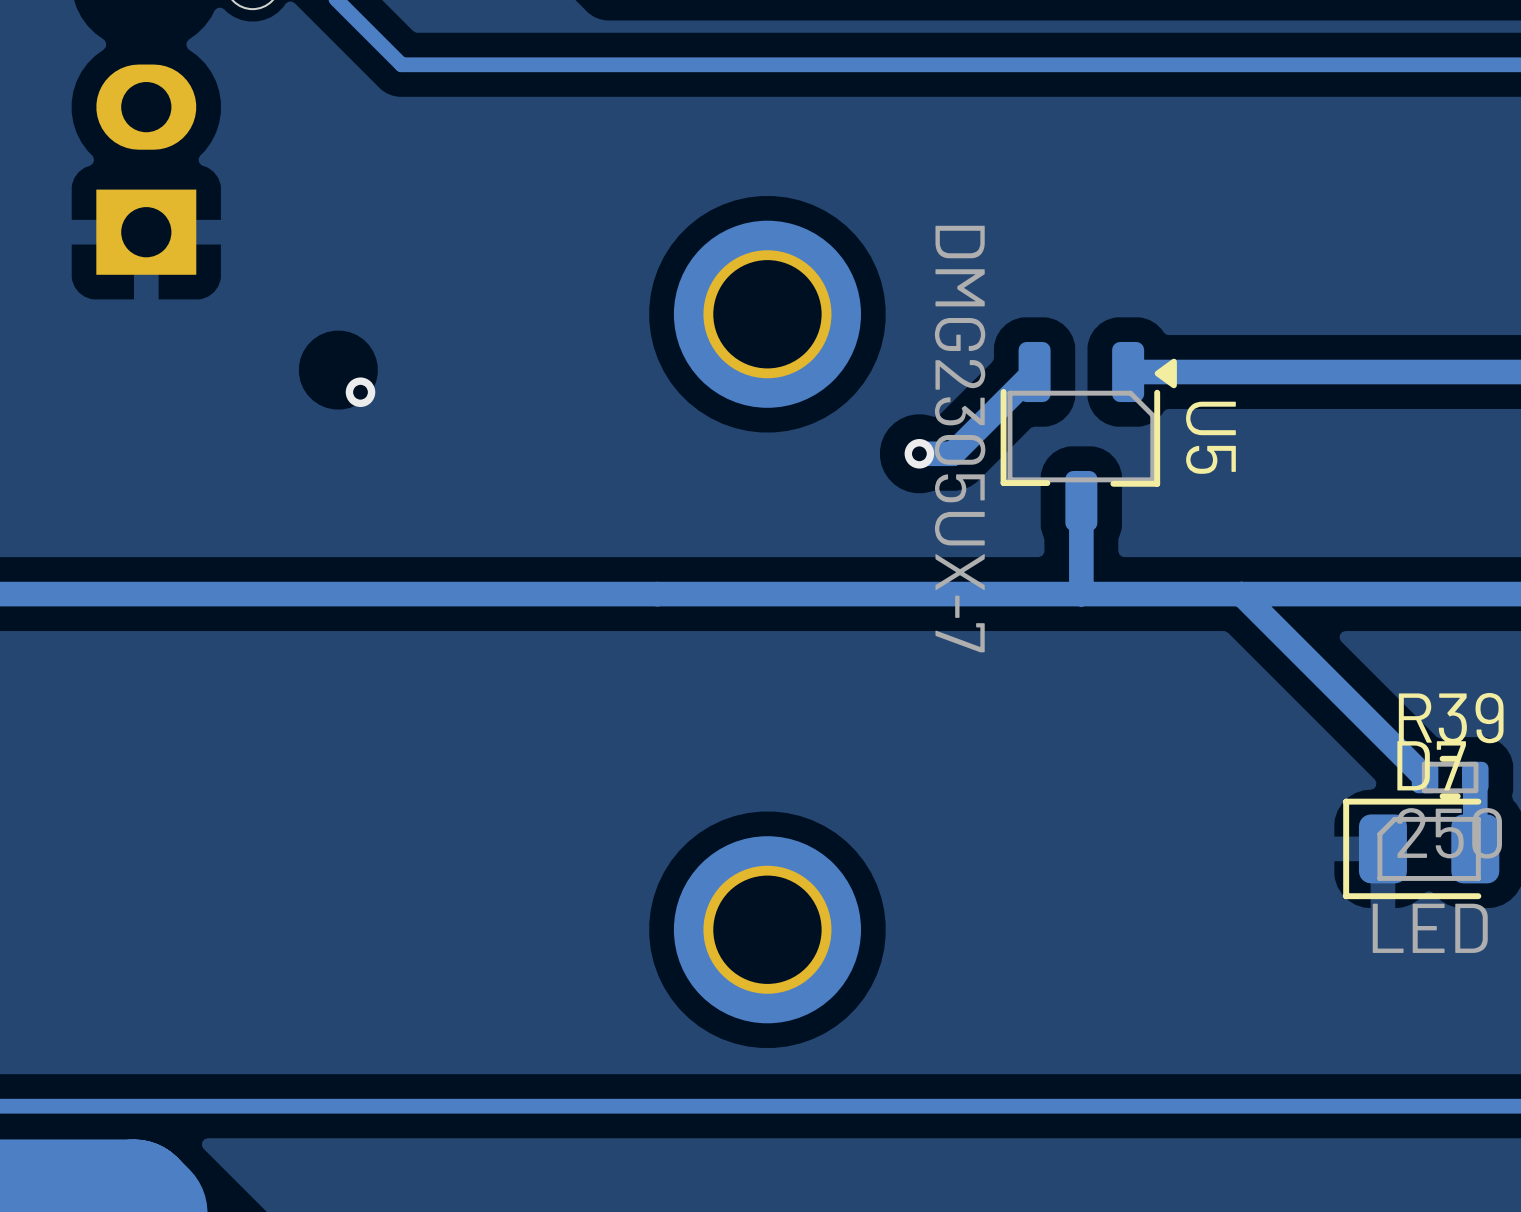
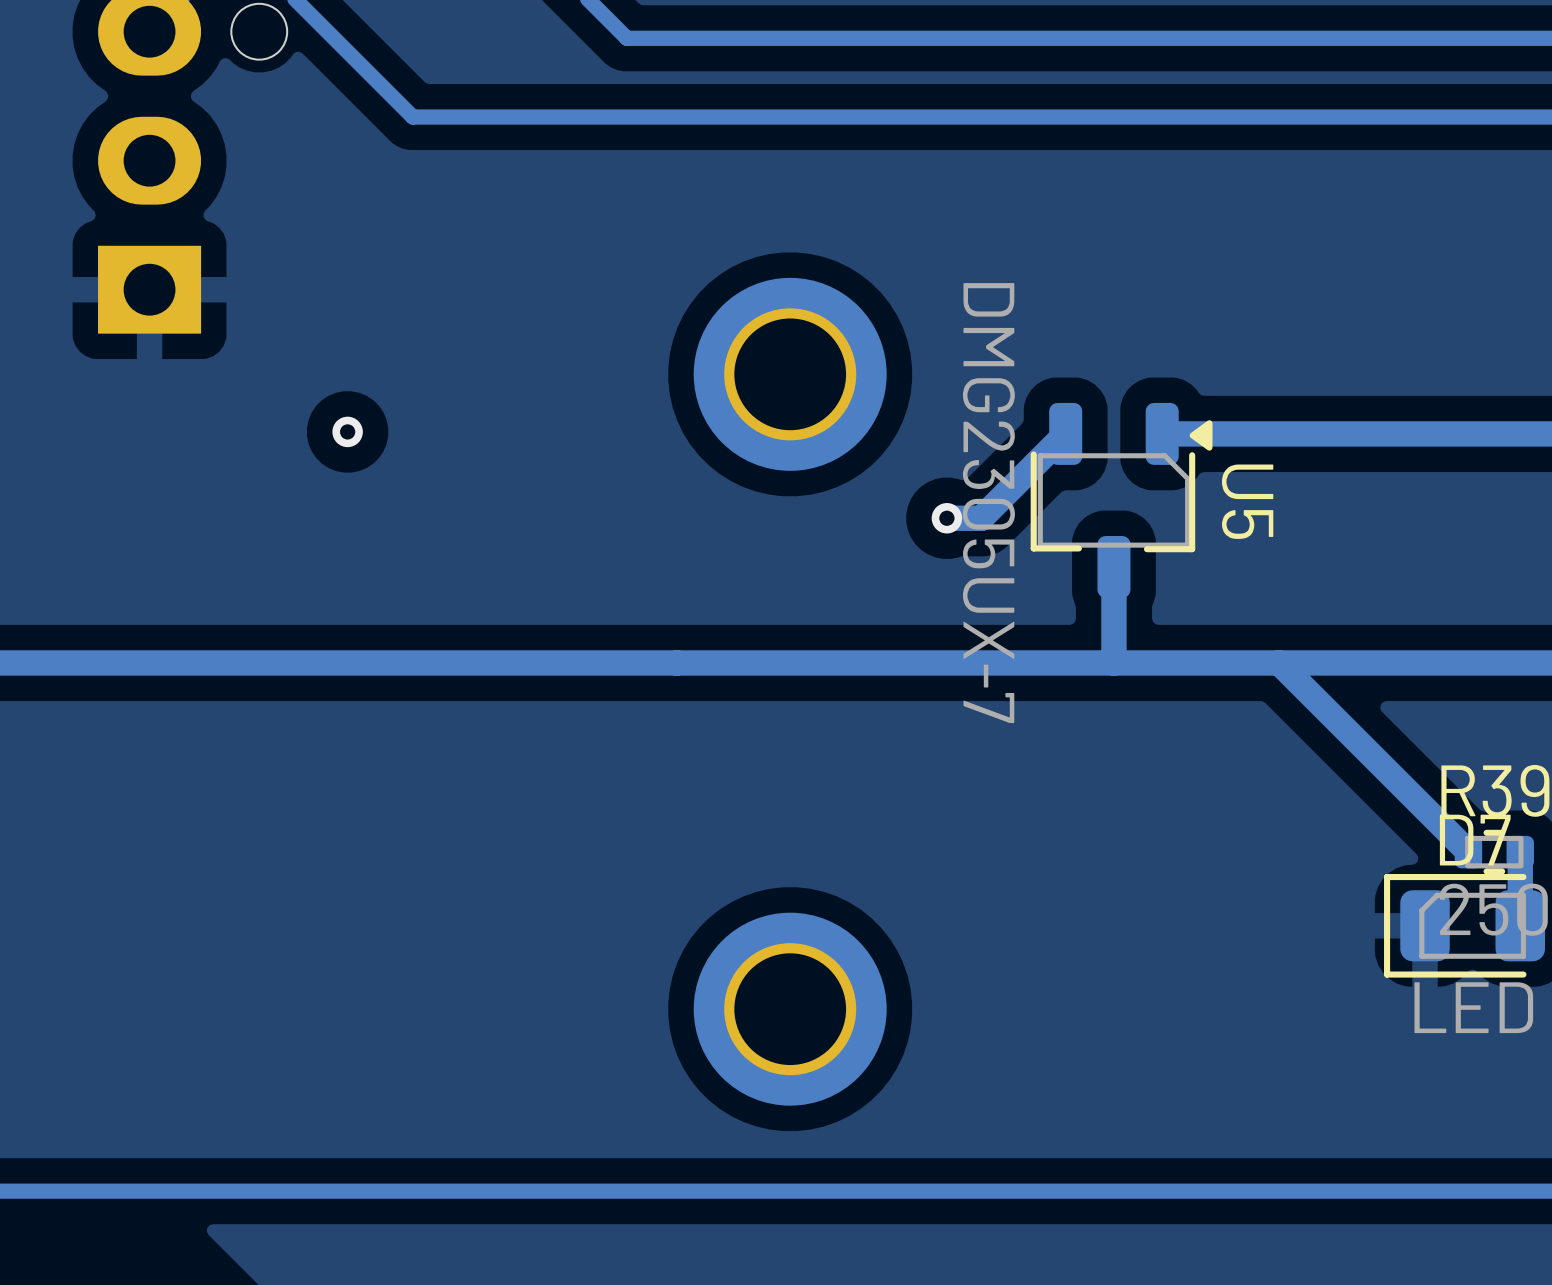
via position: (360, 392) -> (347, 431)

